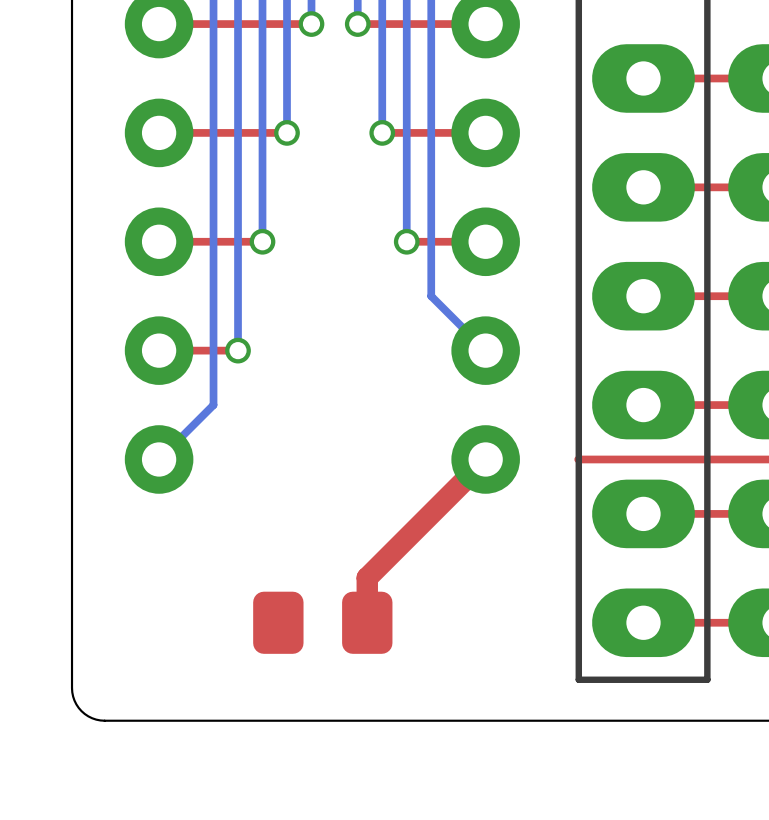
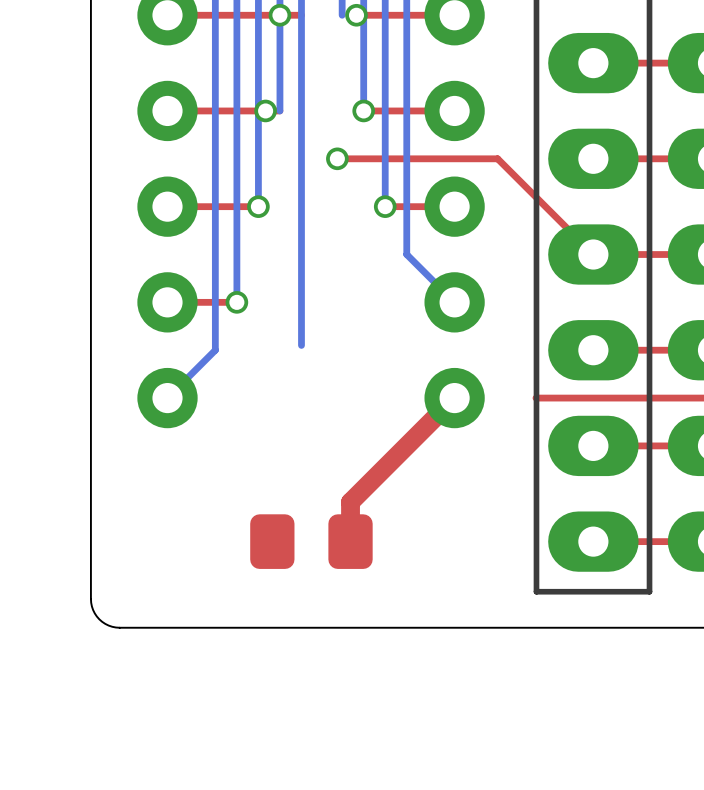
bottom track: none -> (301, 15) (301, 345)
via position: (311, 24) -> (279, 15)
via position: (357, 24) -> (356, 15)
via position: (287, 132) -> (265, 110)
top track: none -> (337, 158) (497, 158) (593, 254)
via: none -> (337, 158)

